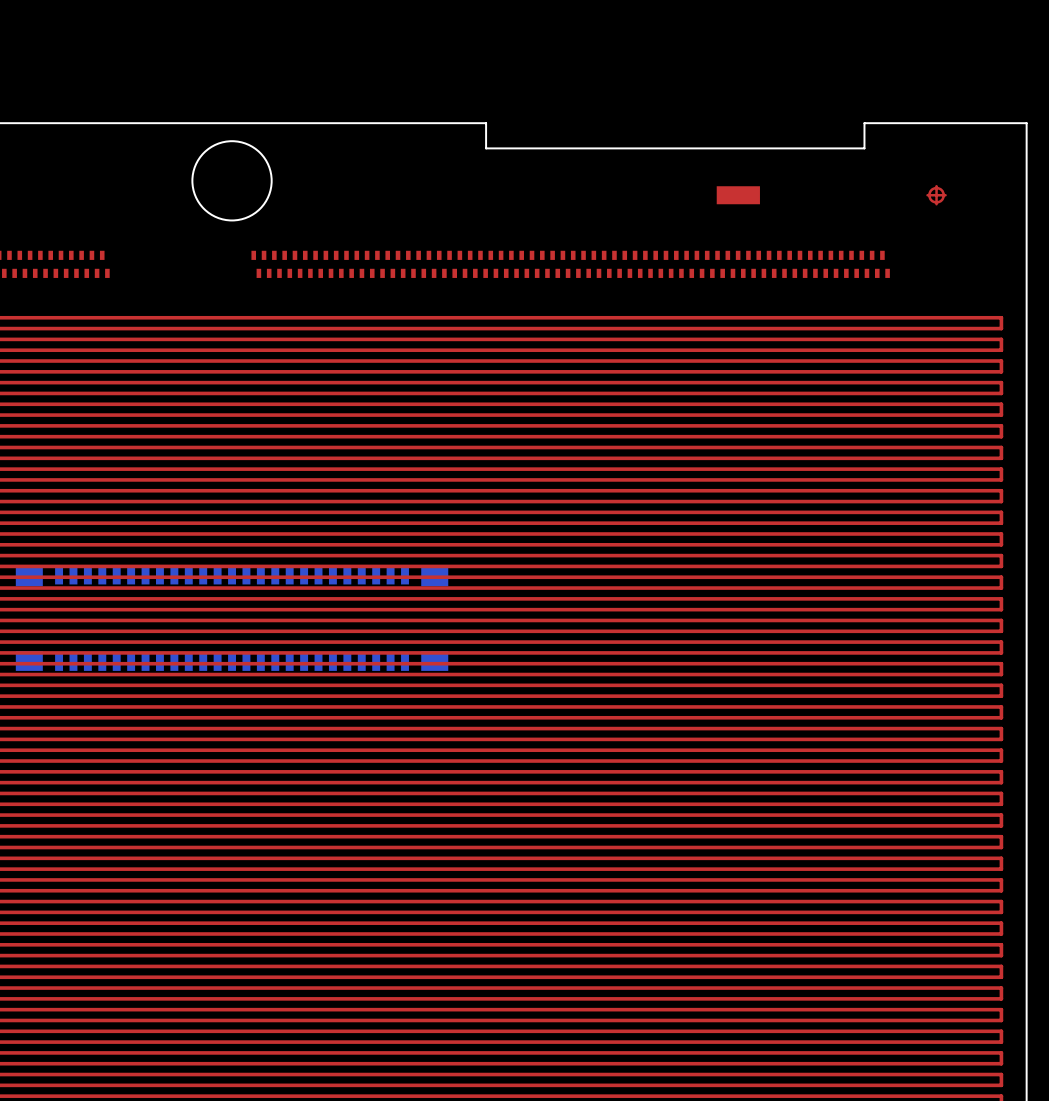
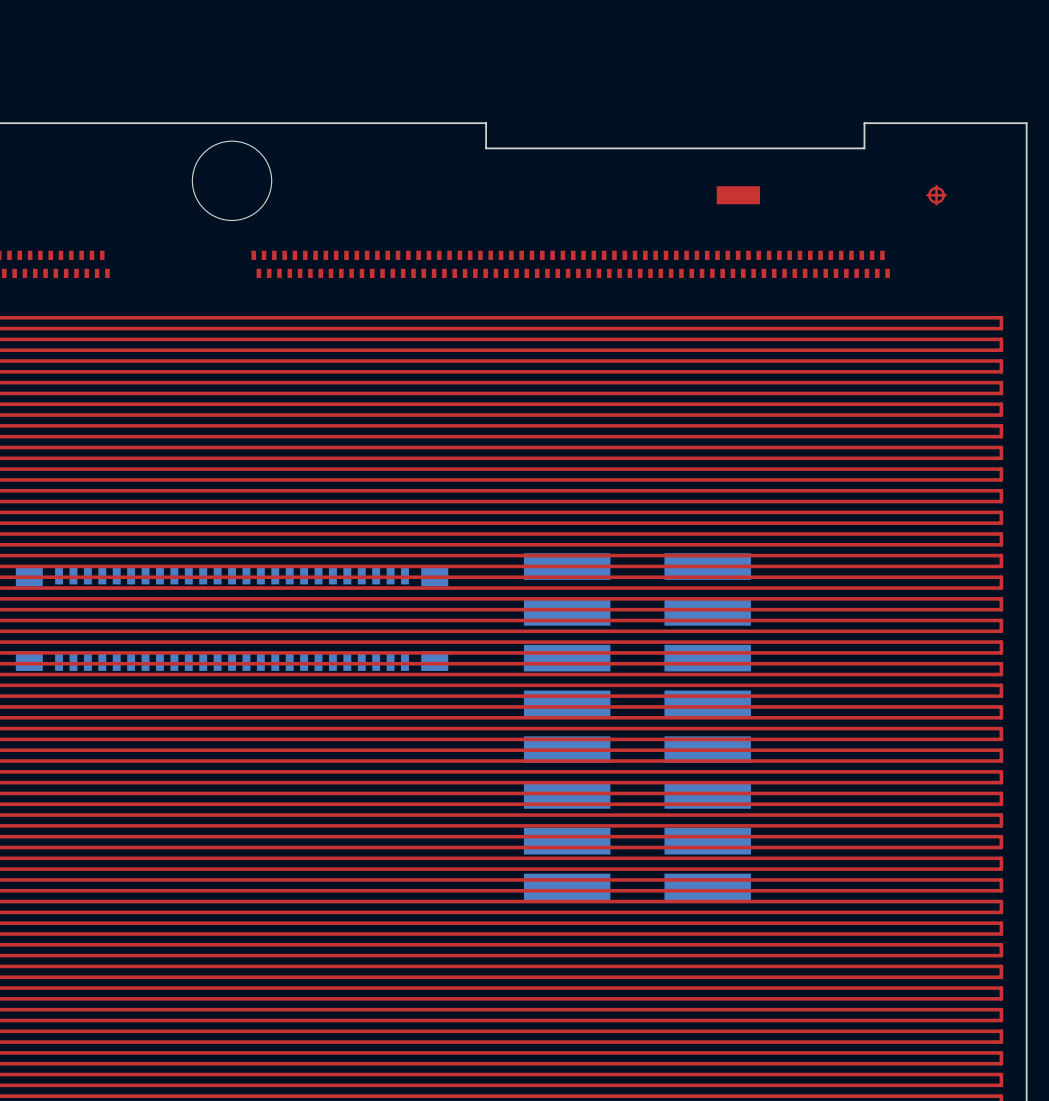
part: none -> (637, 726)

